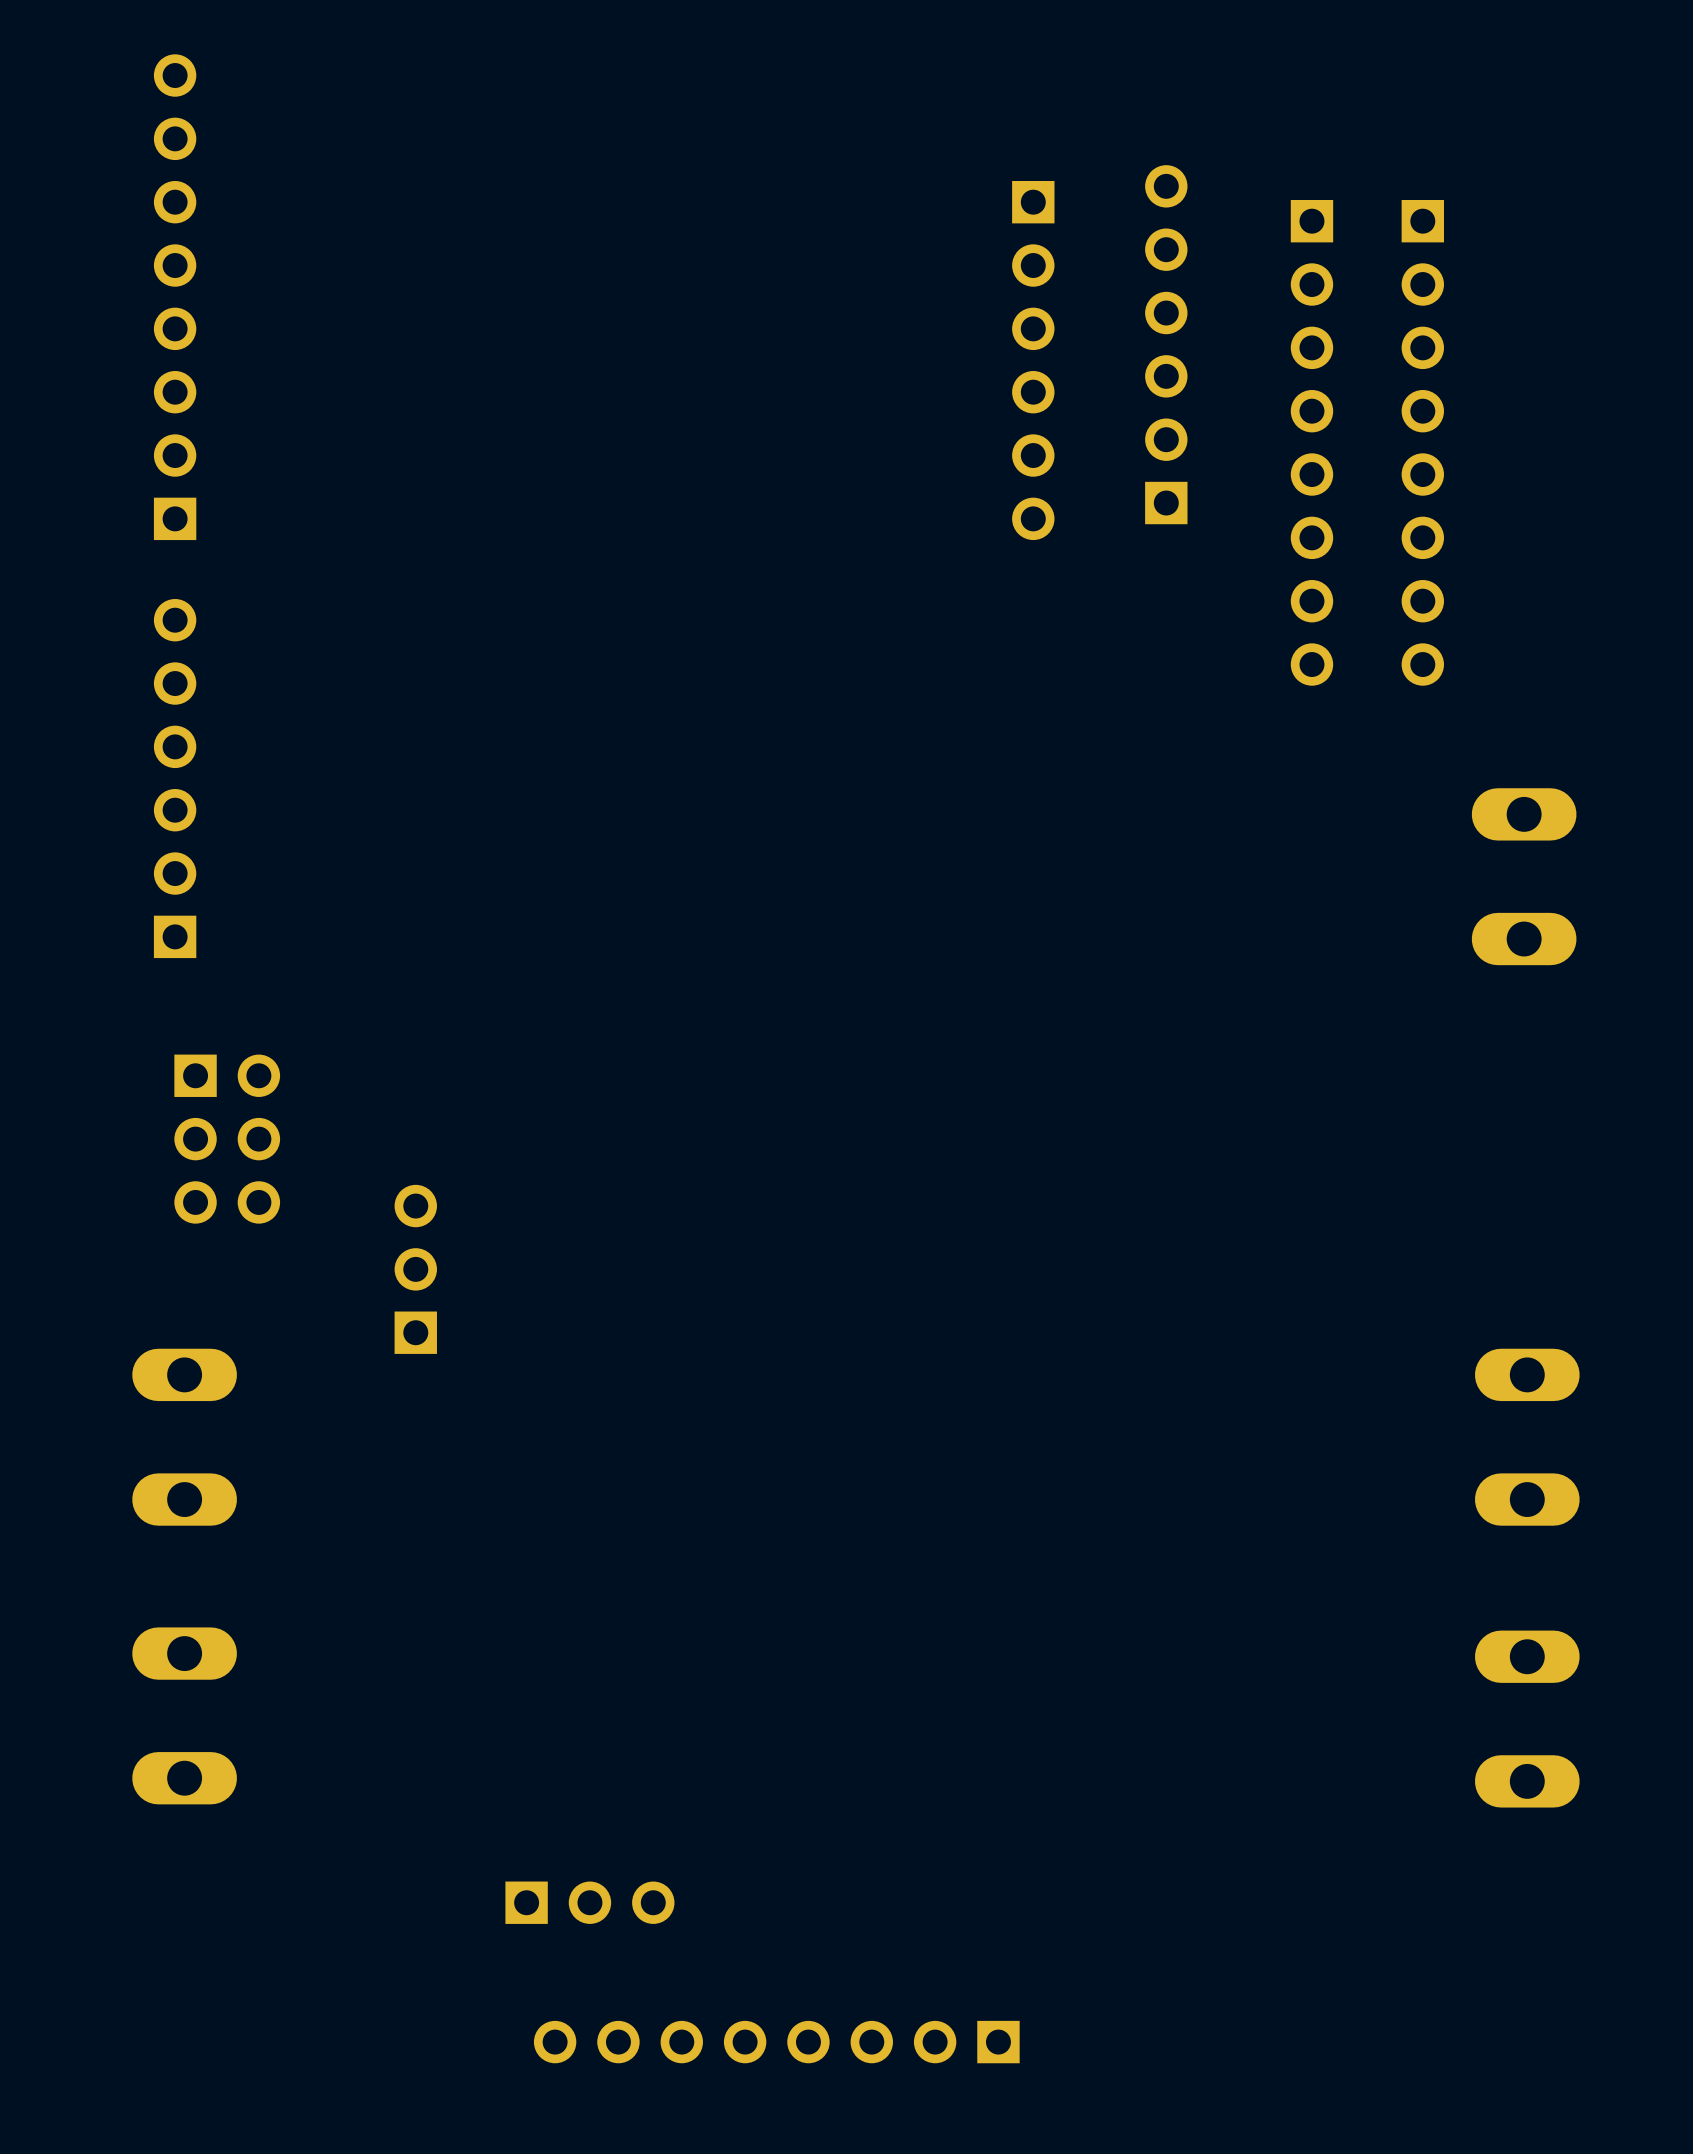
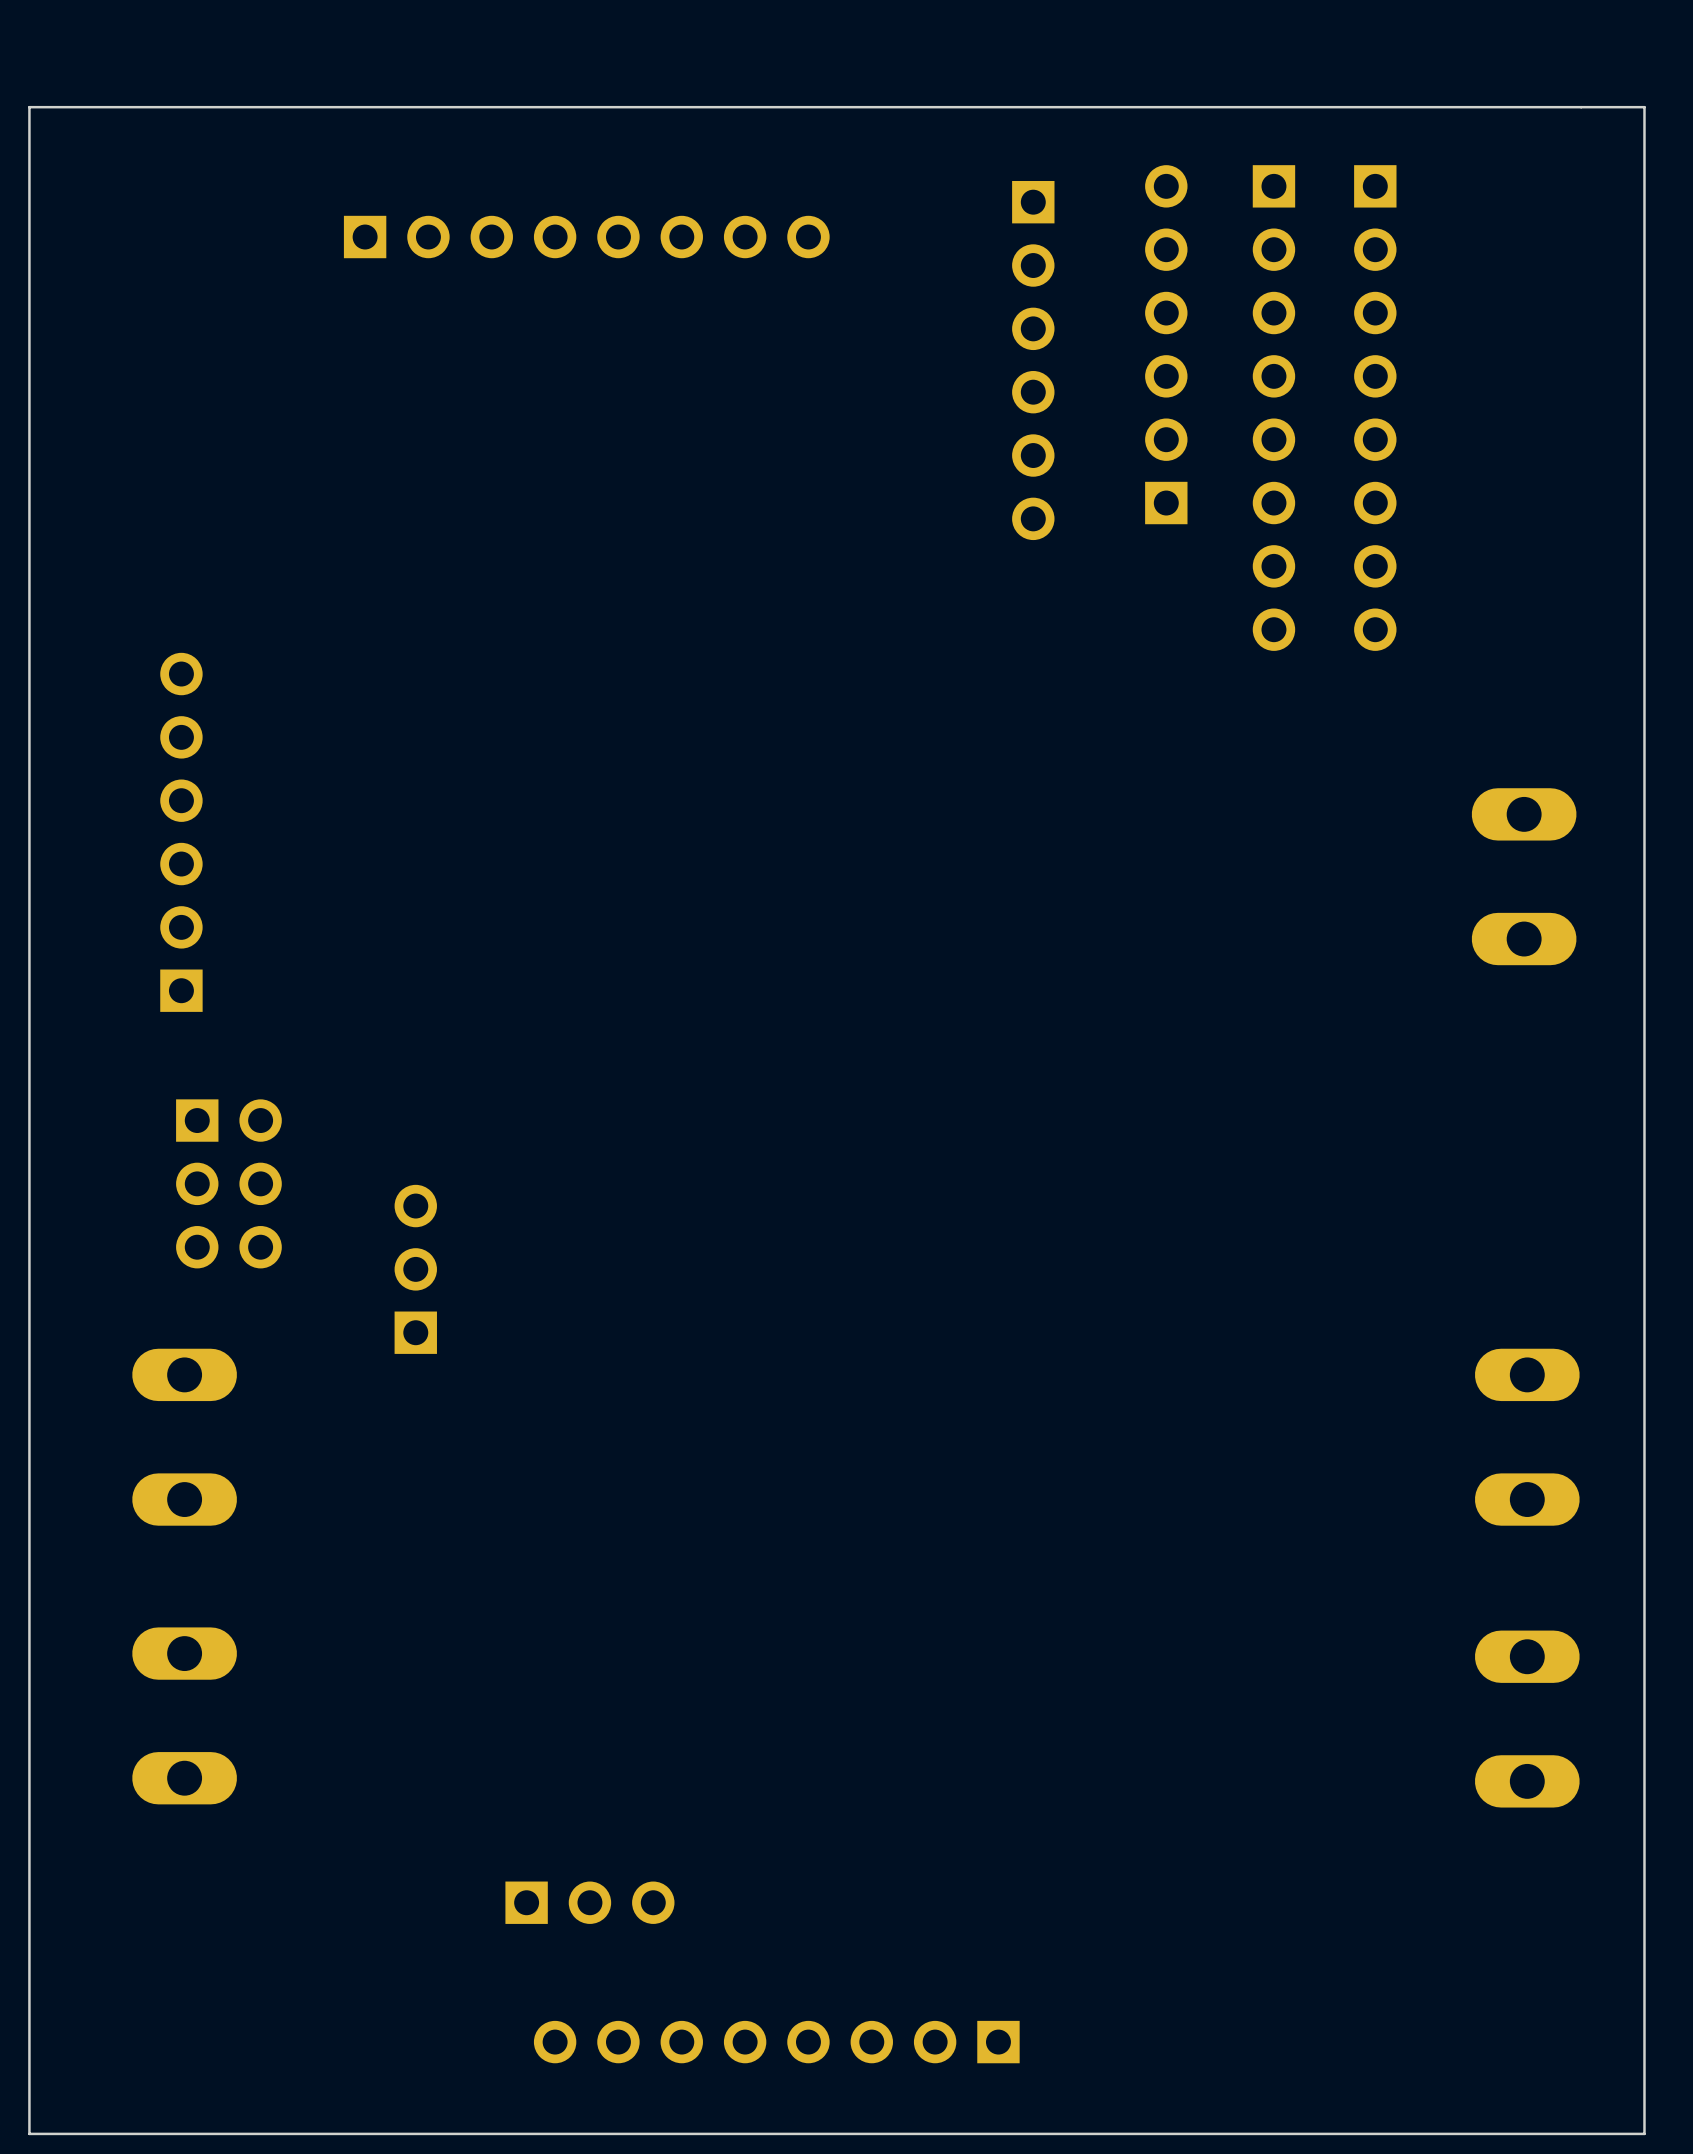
board edge: none -> (1644, 107) (29, 107) (29, 2133) (1644, 2133) (1644, 107)
part: none -> (586, 237)
part: (175, 297) -> none
part: none -> (1273, 408)
part: none -> (1375, 408)
part: (1311, 442) -> none
part: (1422, 442) -> none
part position: (175, 778) -> (181, 832)
part position: (227, 1139) -> (228, 1183)

